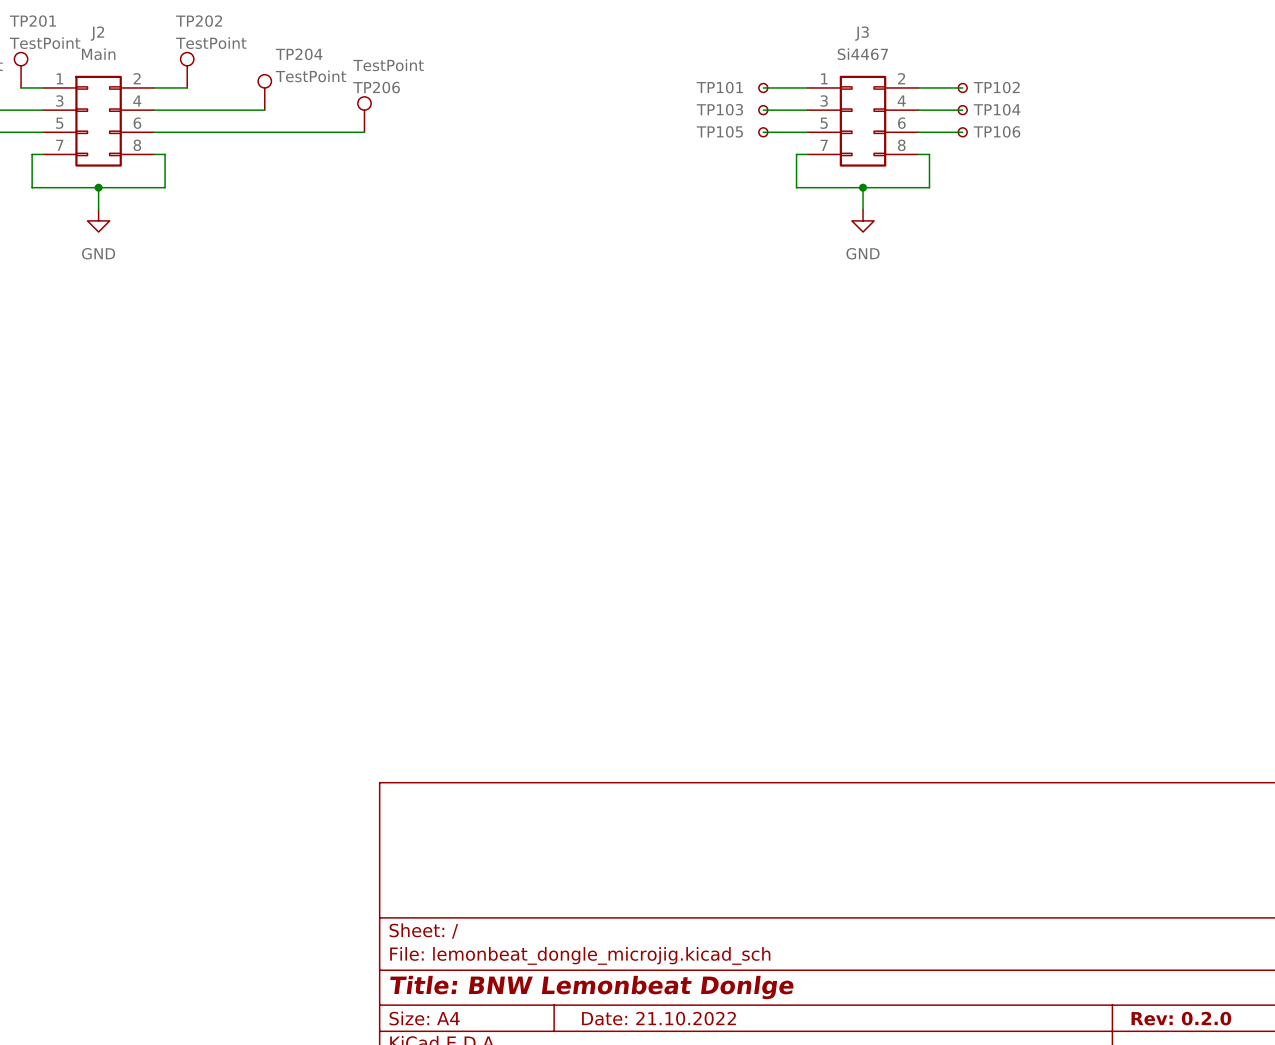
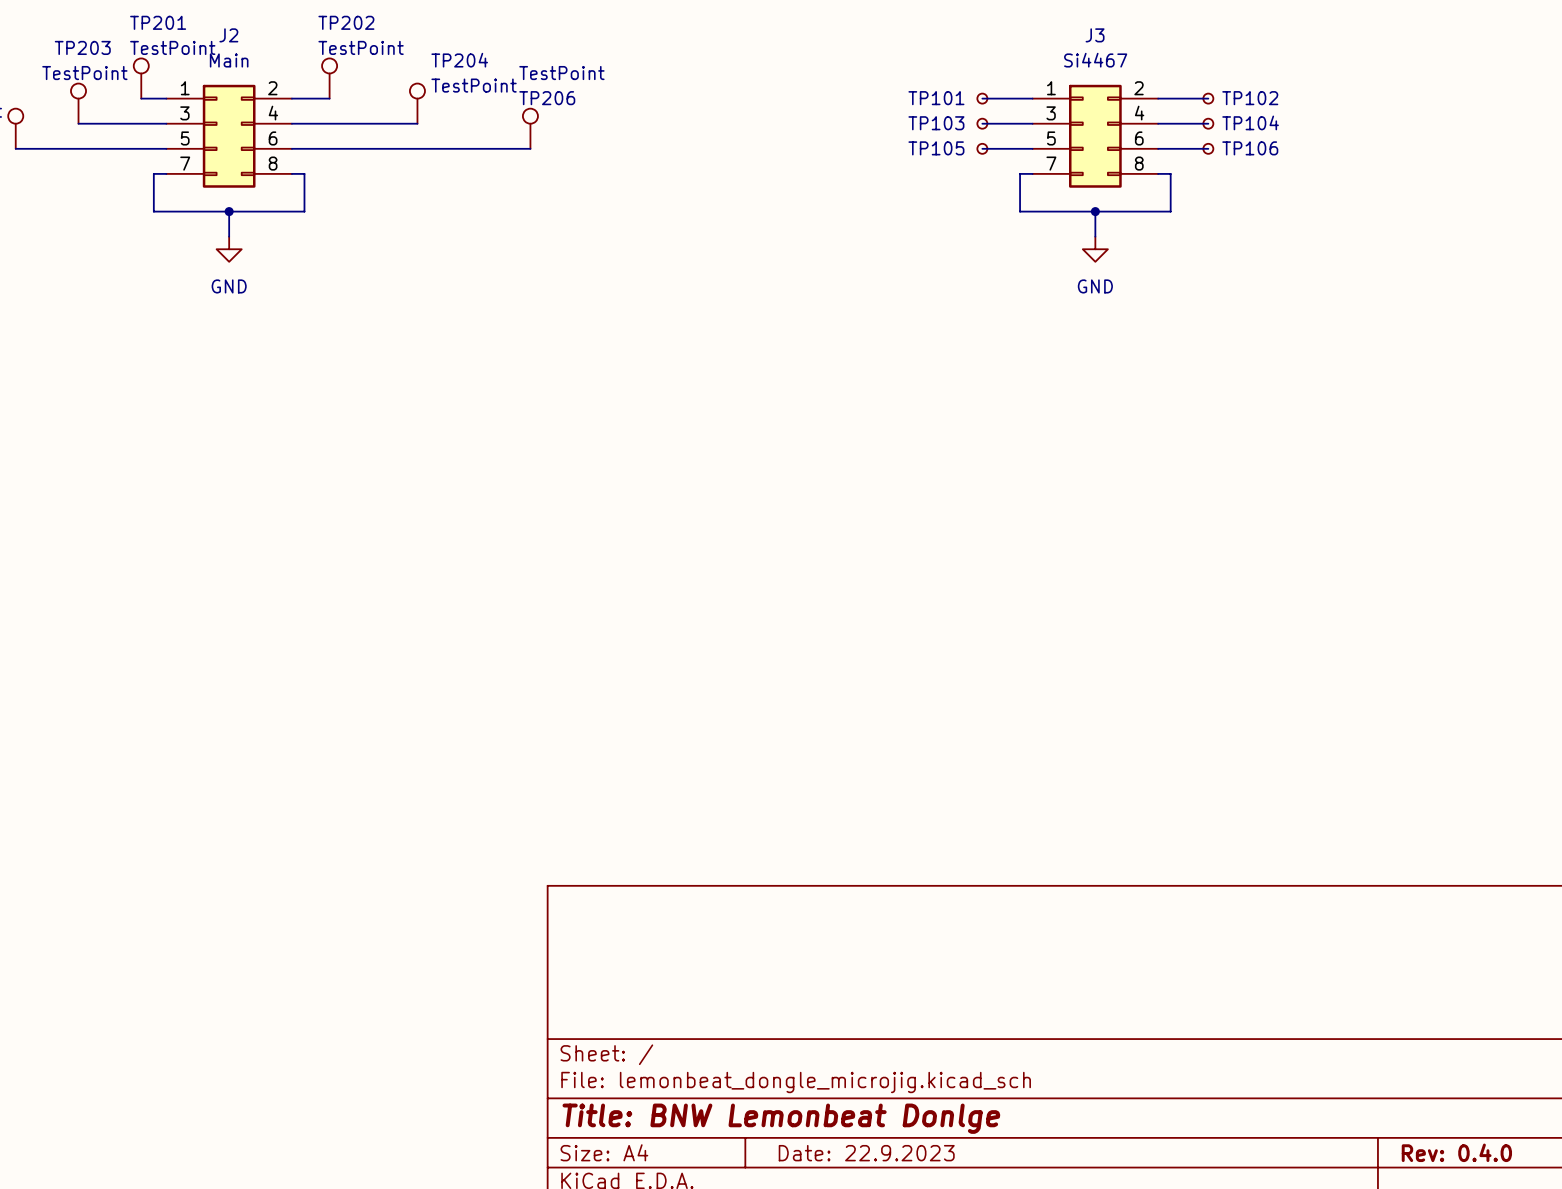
title block: Date: 21.10.2022 (658, 1018) -> Date: 22.9.2023 (866, 1153)
title block: Rev: 0.2.0 (1181, 1018) -> Rev: 0.4.0 (1456, 1152)

